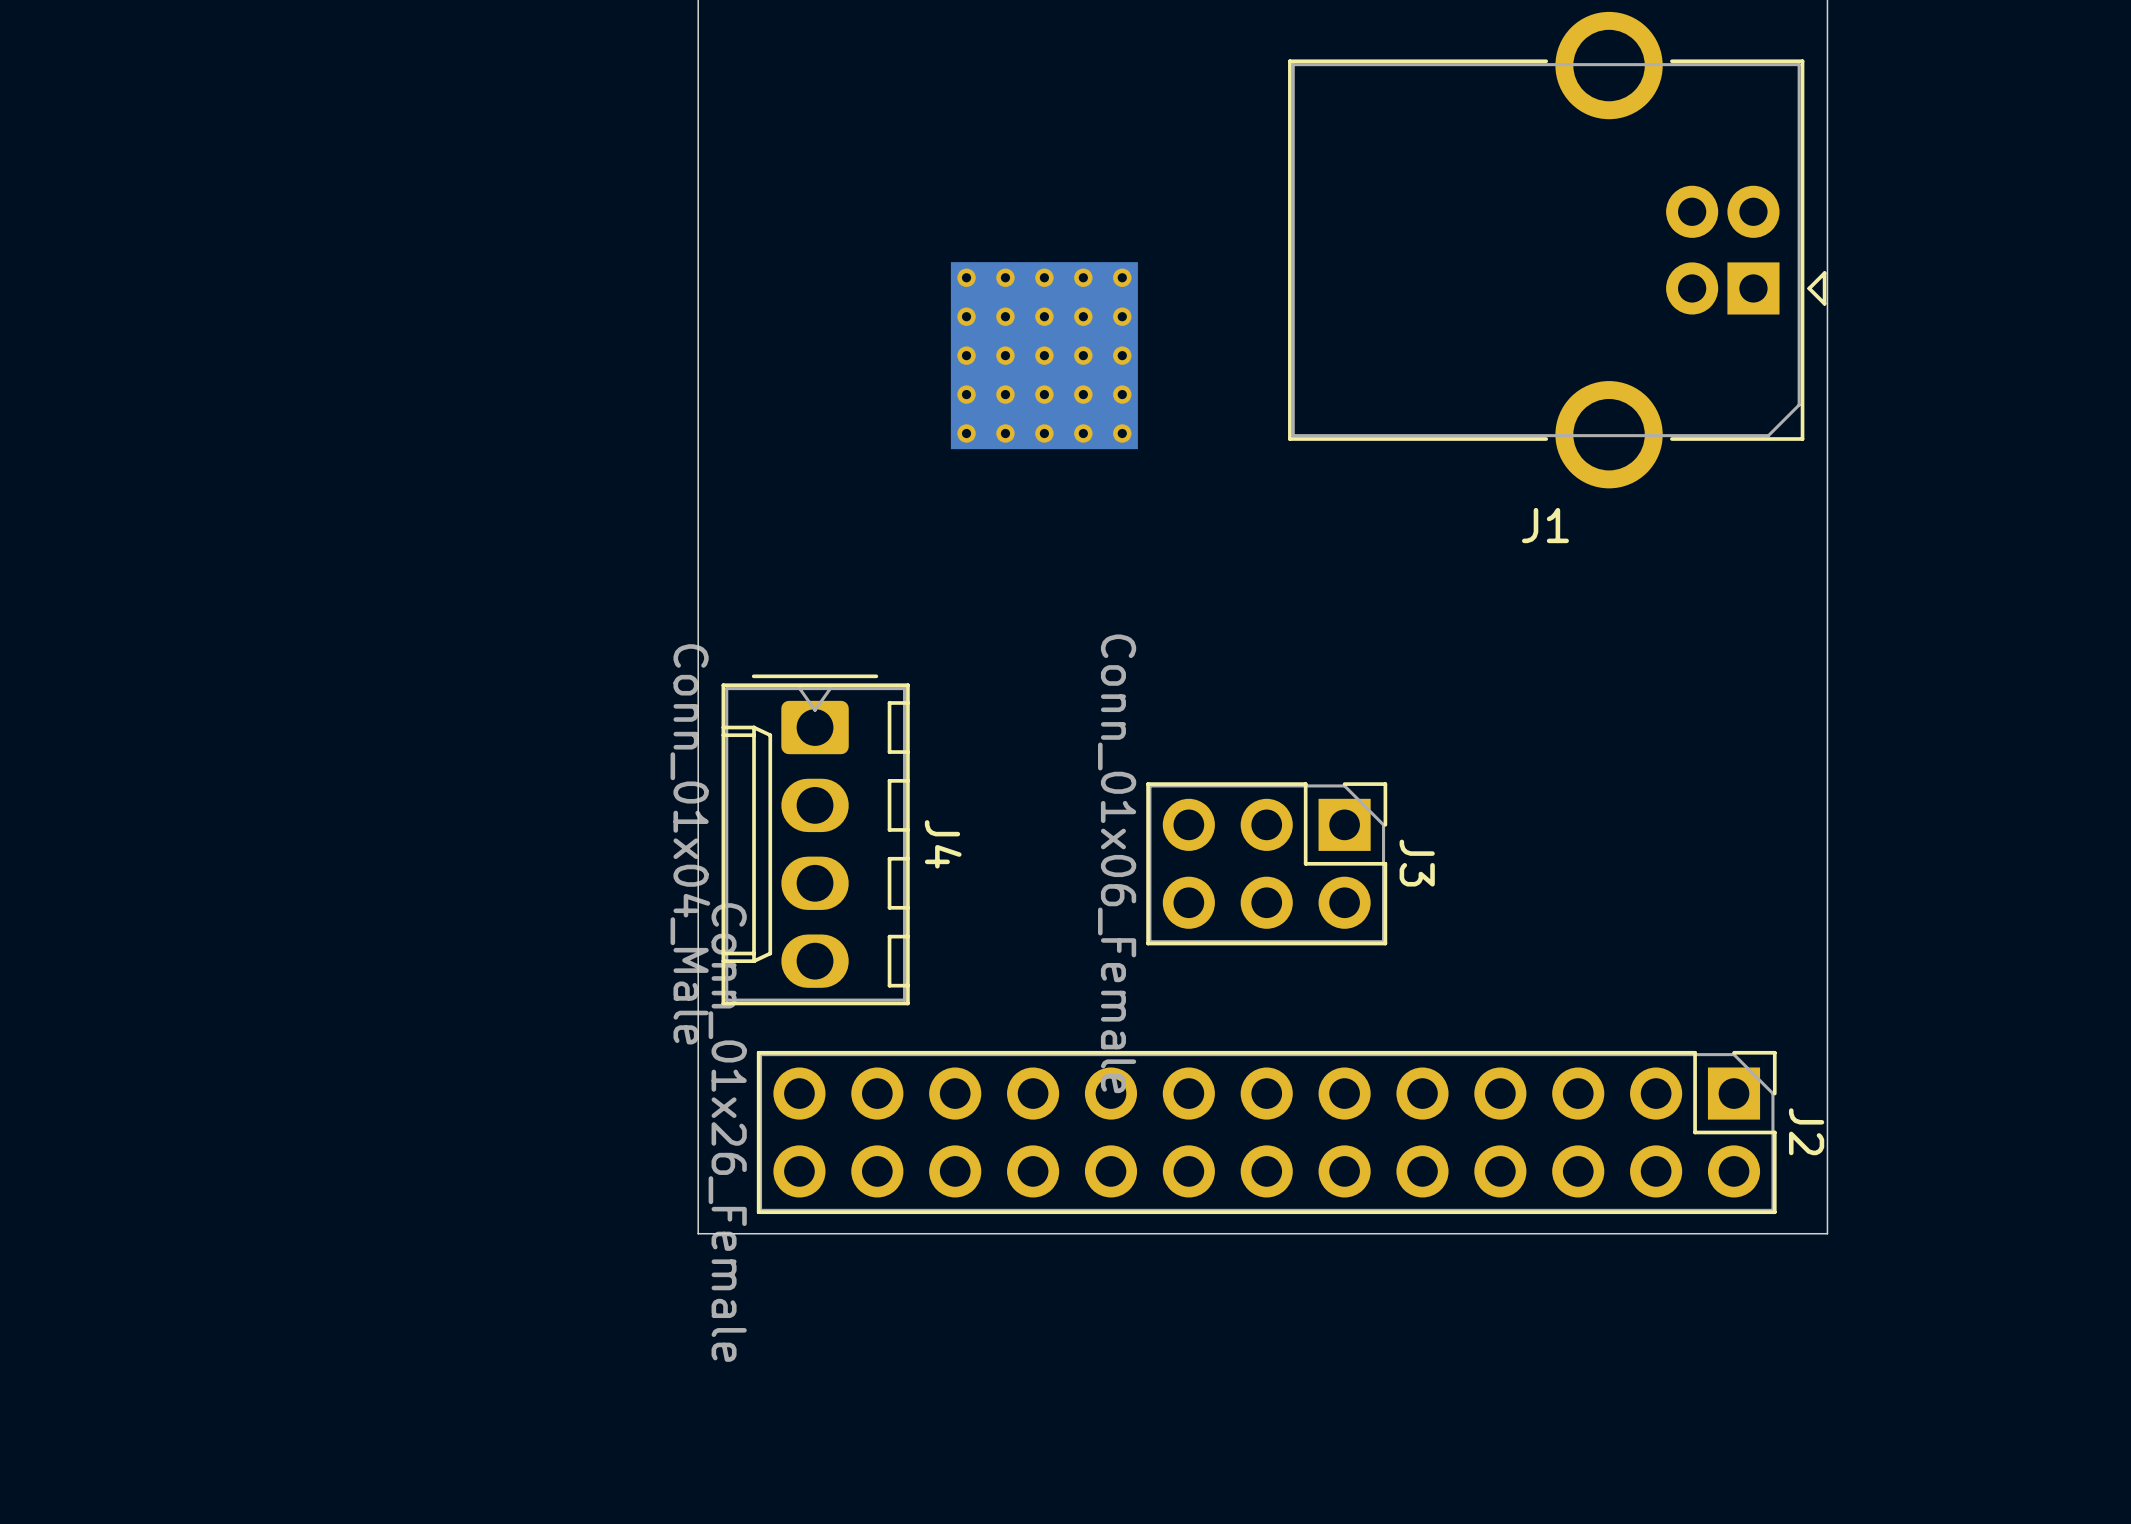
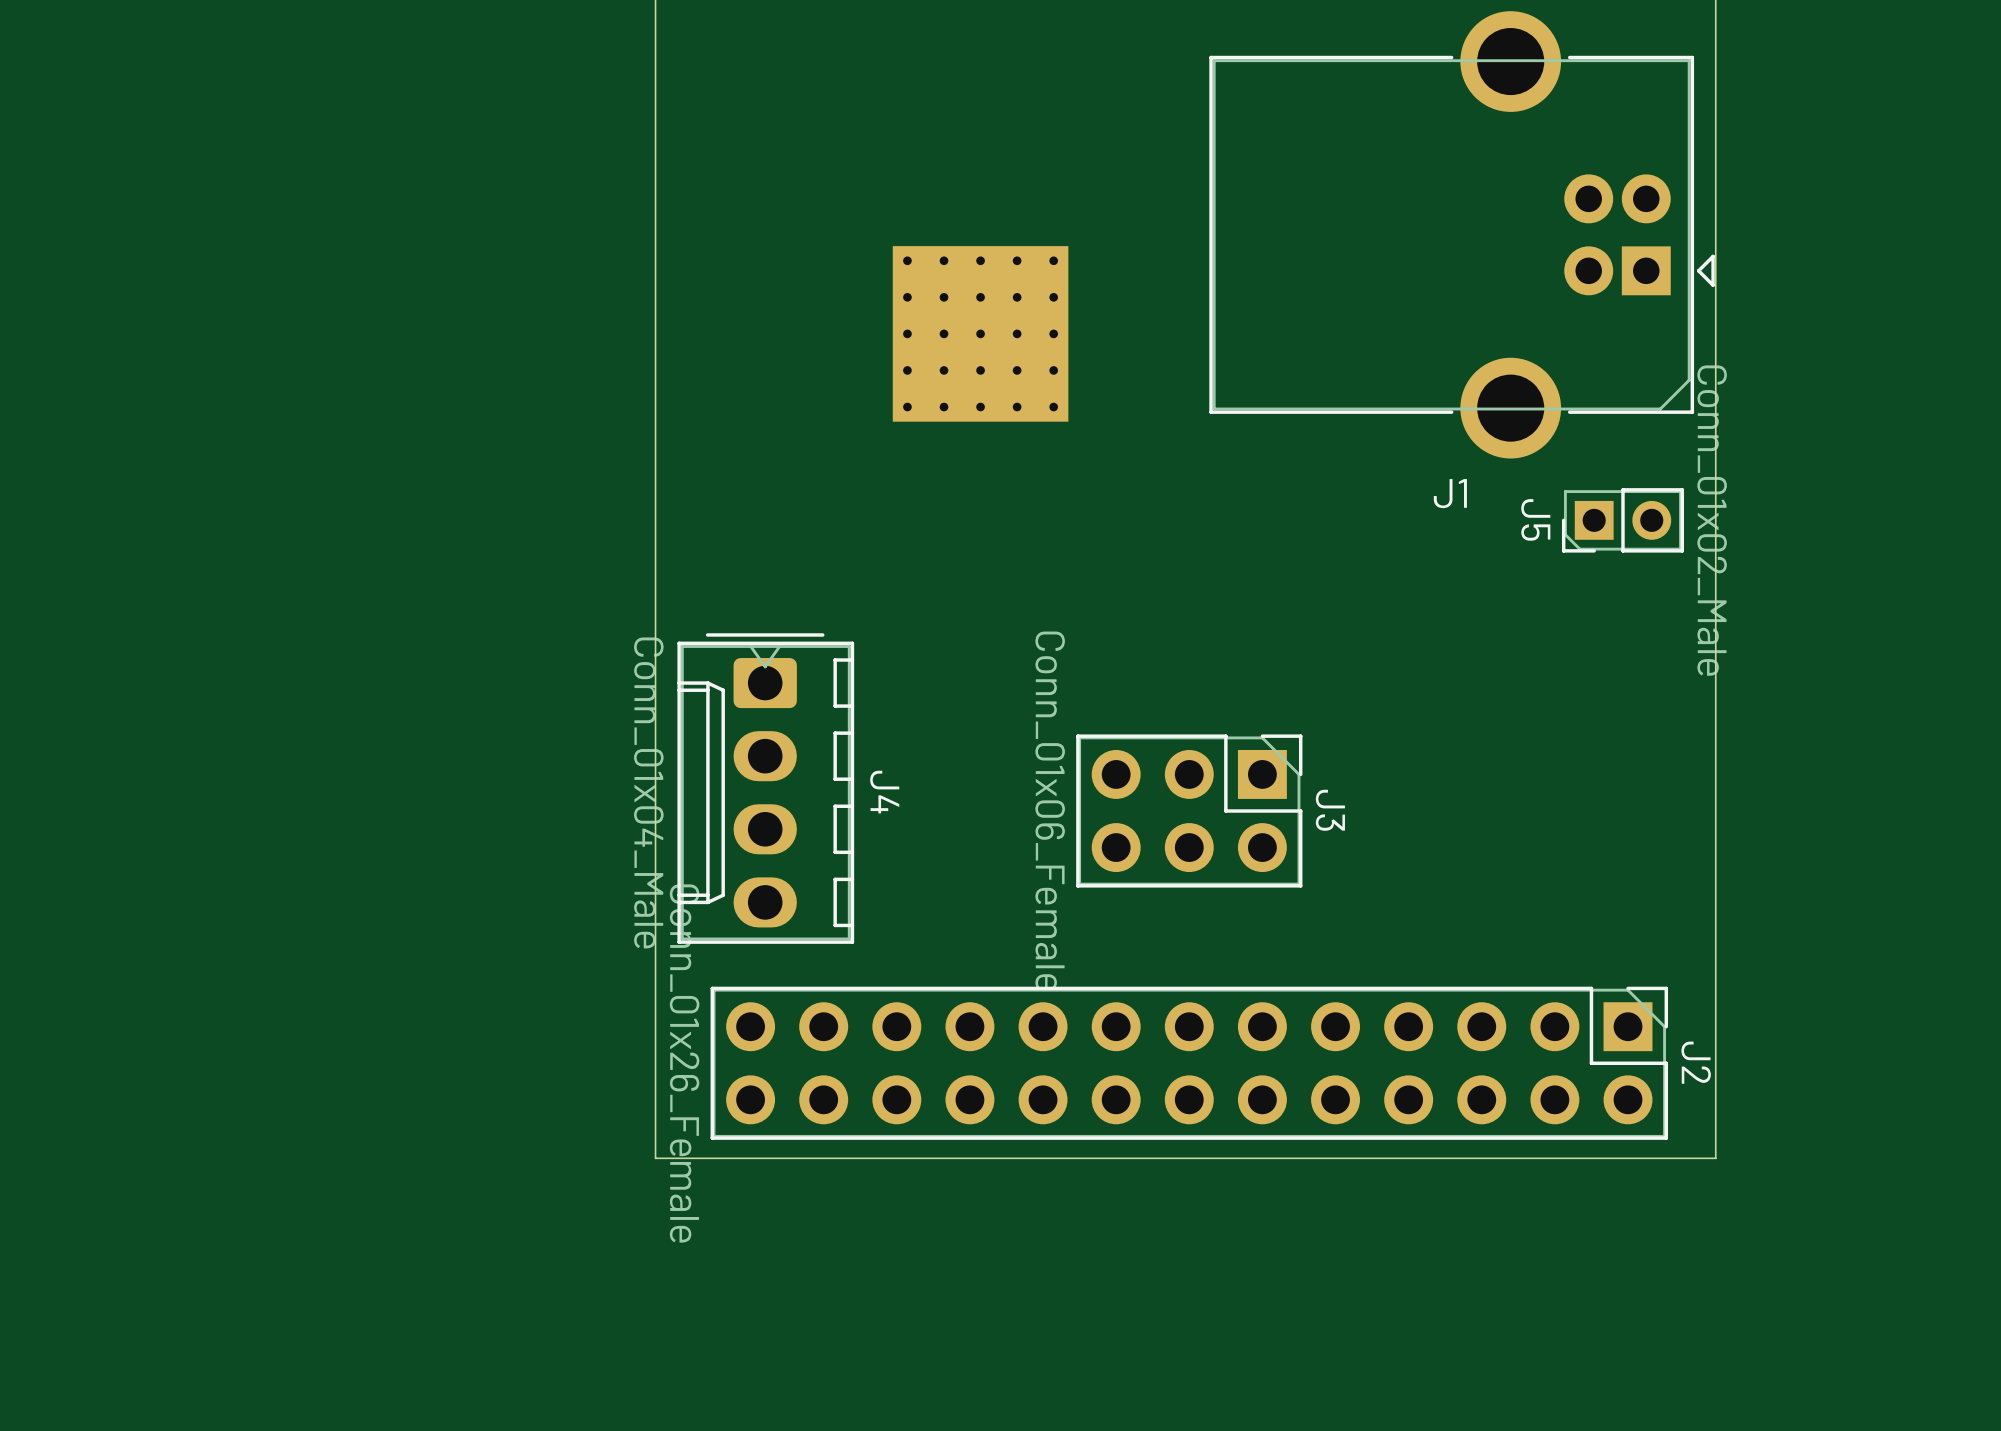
J5: none -> Conn_01x02_Male (1622, 520)

